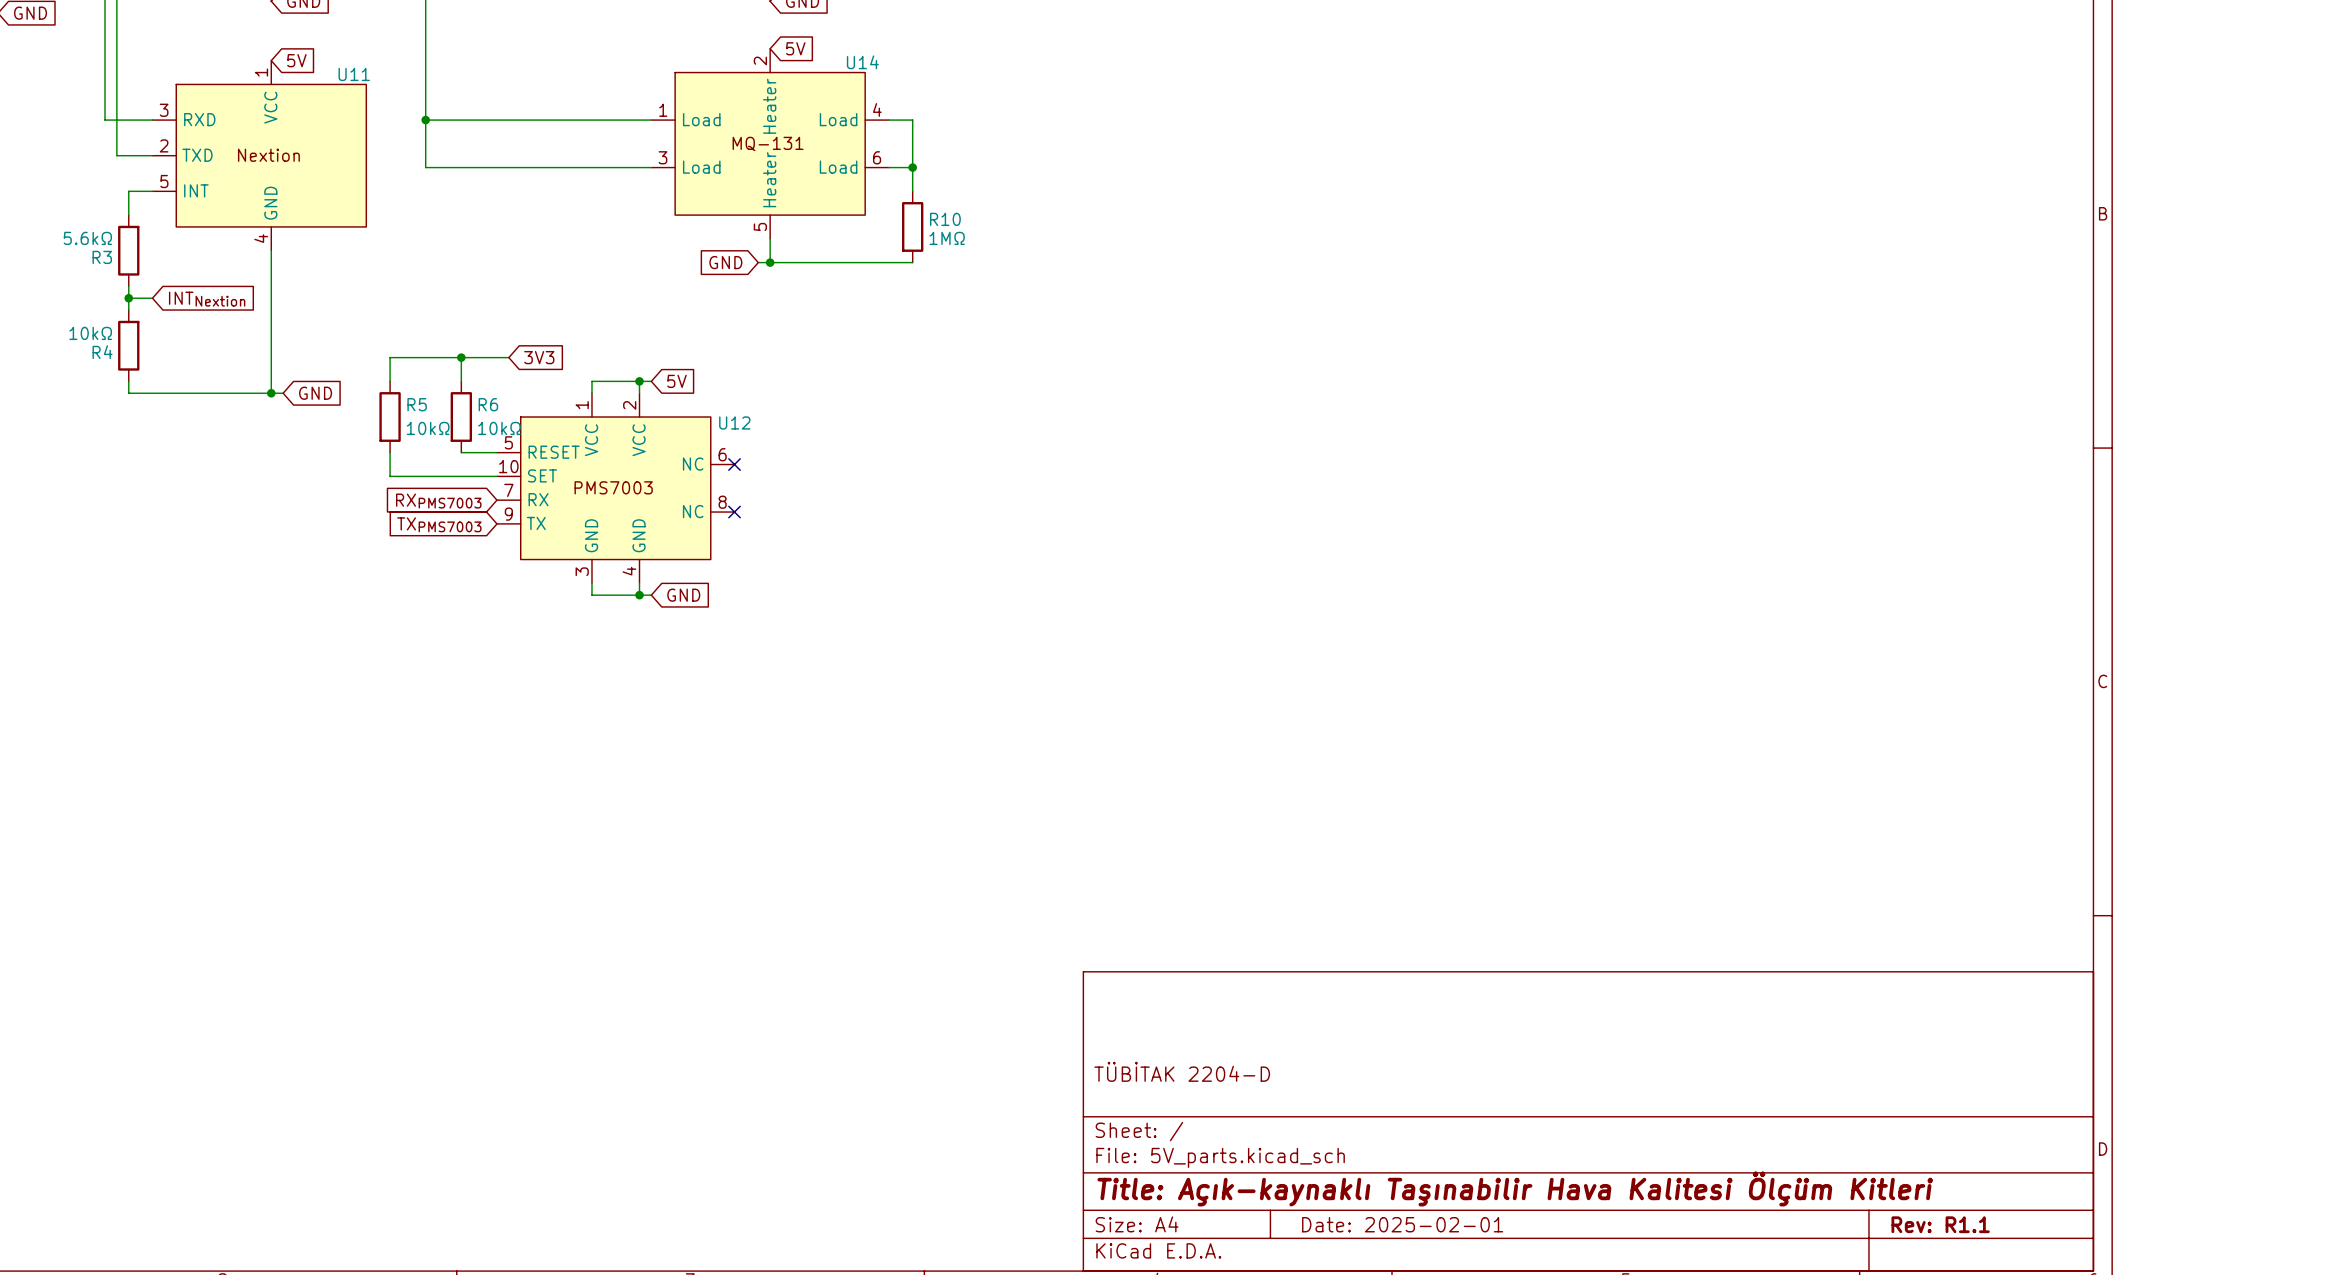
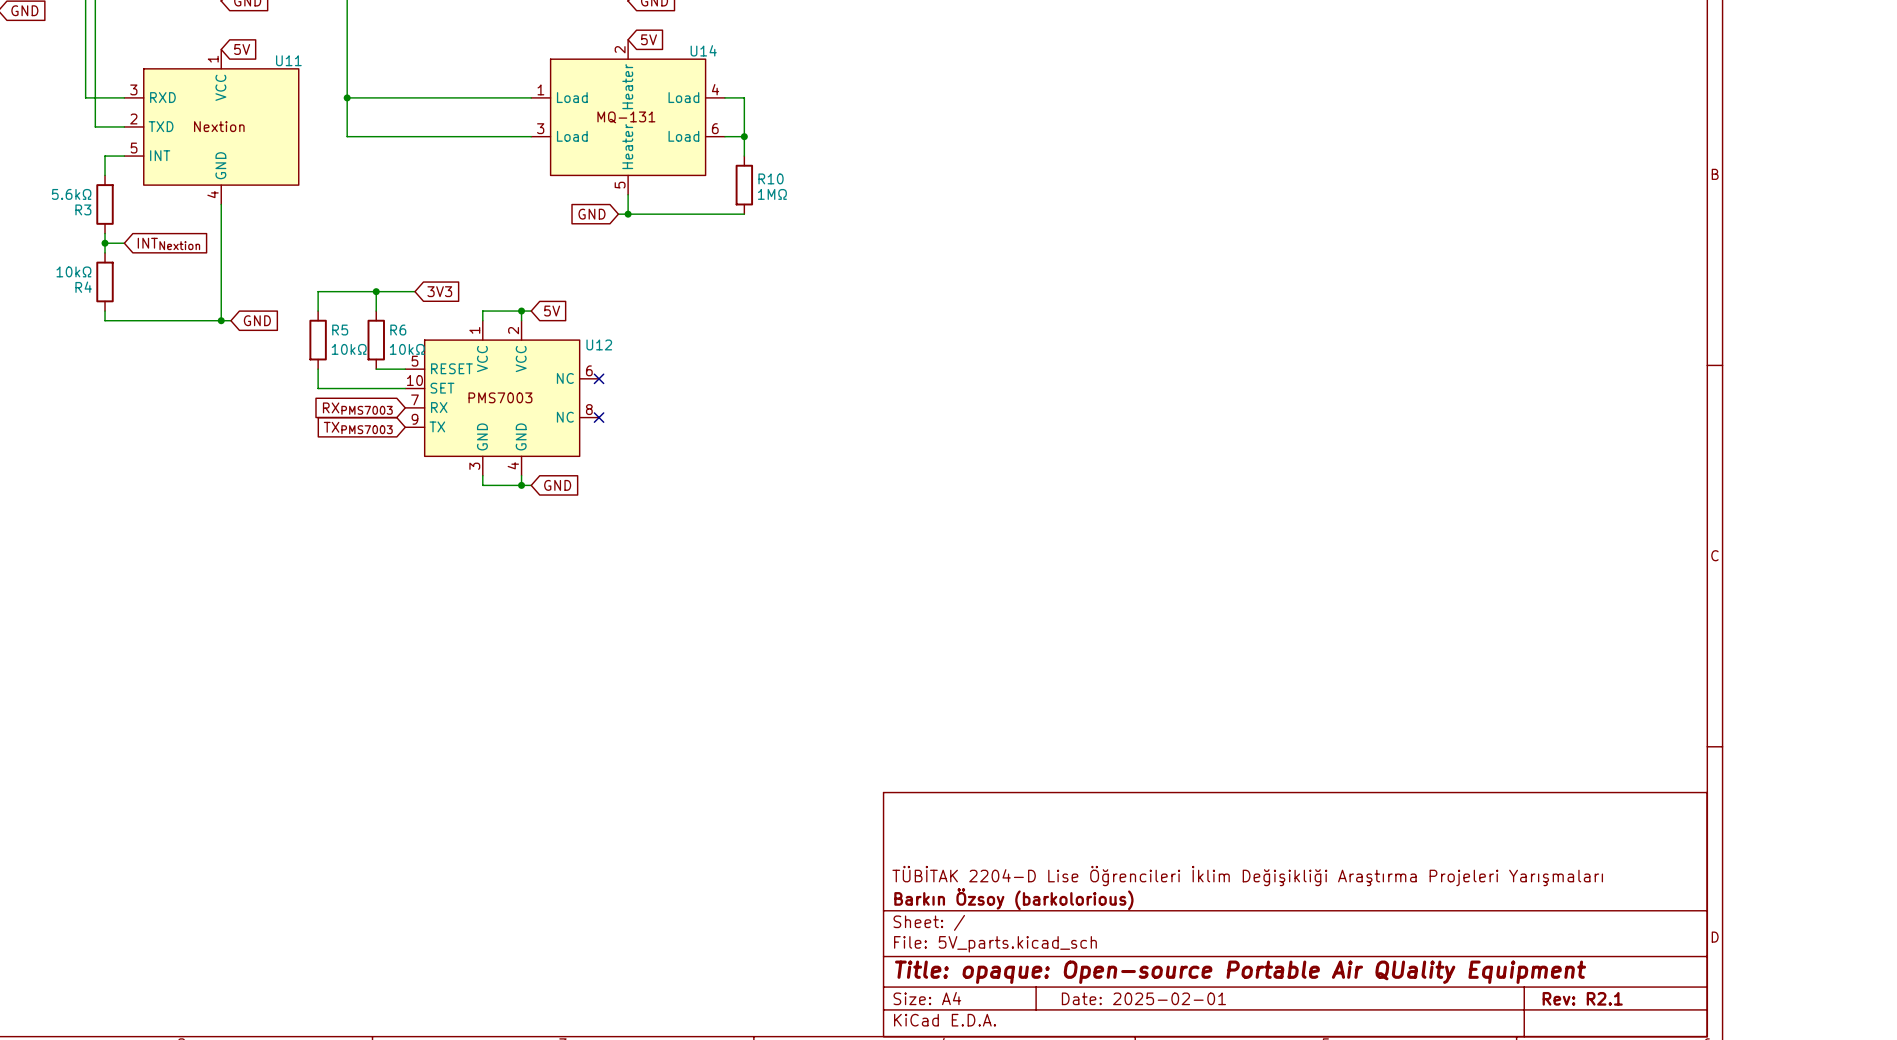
title block: TÜBİTAK 2204-D (1182, 1071) -> TÜBİTAK 2204-D Lise Öğrencileri İklim Değişikliği Araştırma Projeleri Yarışmaları (1247, 876)
title block: none -> Barkın Özsoy (barkolorious) (1013, 899)
title block: Title: Açık-kaynaklı Taşınabilir Hava Kalitesi Ölçüm Kitleri (1515, 1189) -> Title: opaque: Open-source Portable Air QUality Equipment (1240, 972)
title block: Rev: R1.1 (1940, 1224) -> Rev: R2.1 (1582, 998)

